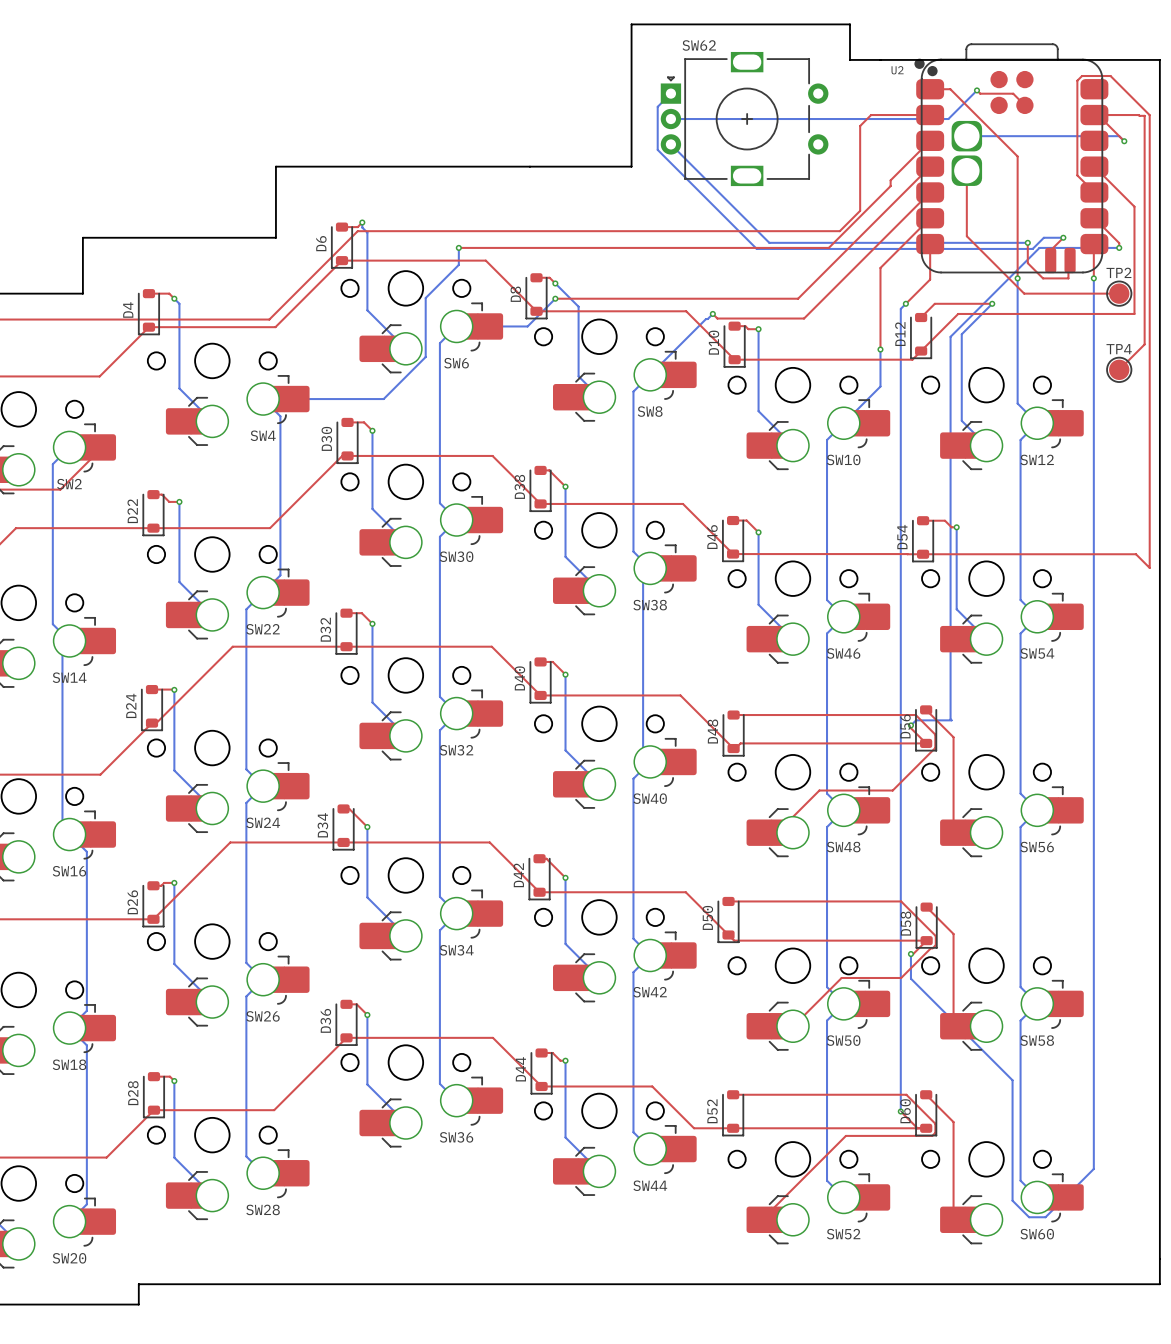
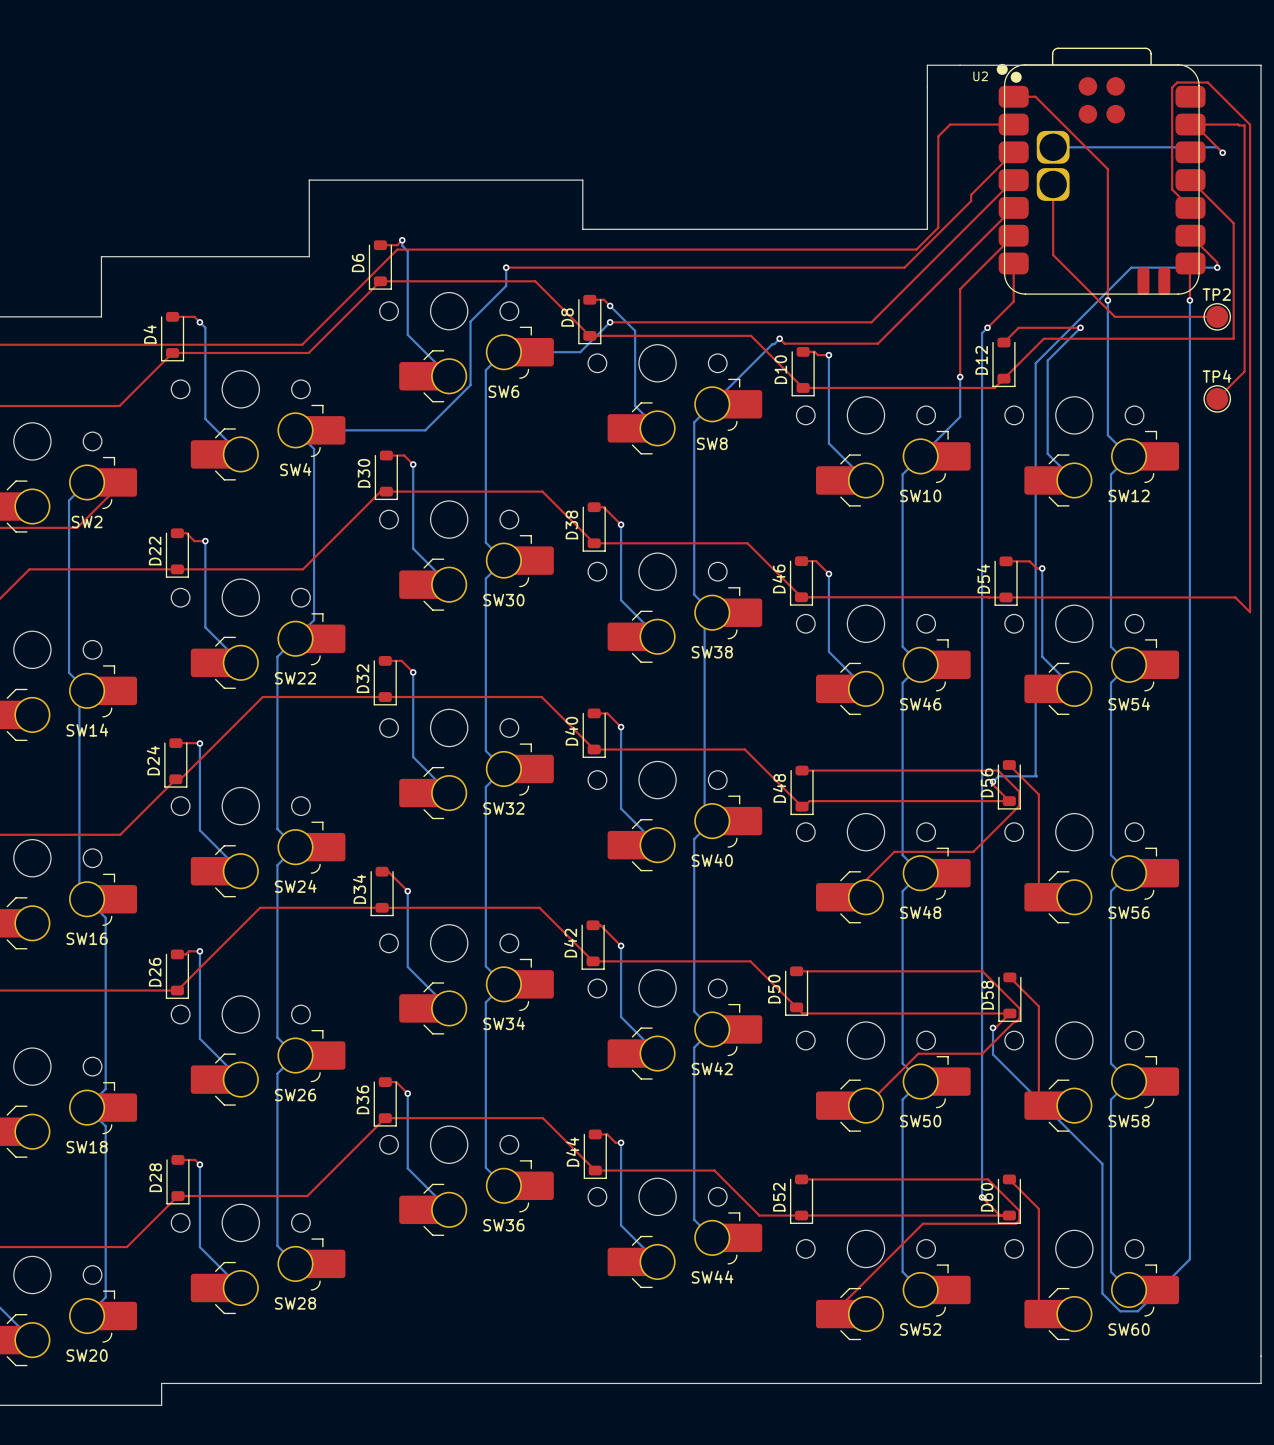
board edge: (850, 59) (850, 24) (631, 24) (631, 166) (529, 166) -> (927, 65) (927, 229) (582, 229) (582, 180)
top track: (977, 90) (980, 93) (1013, 93) (1024, 105) -> none
bottom track: (977, 90) (948, 119) (670, 119) -> none
via: (977, 90) -> none
bottom track: (670, 93) (657, 106) (657, 149) (756, 248) (1032, 248) (1043, 237) (1063, 237) -> none
SW62: (744, 119) -> none
bottom track: (670, 144) (769, 242) (1027, 242) -> none
top track: (1063, 237) (1050, 250) (1050, 260) -> none
via: (1063, 237) -> none
top track: (1027, 242) (1027, 263) (1043, 278) (1068, 278) (1070, 260) -> none
via: (1027, 242) -> none

